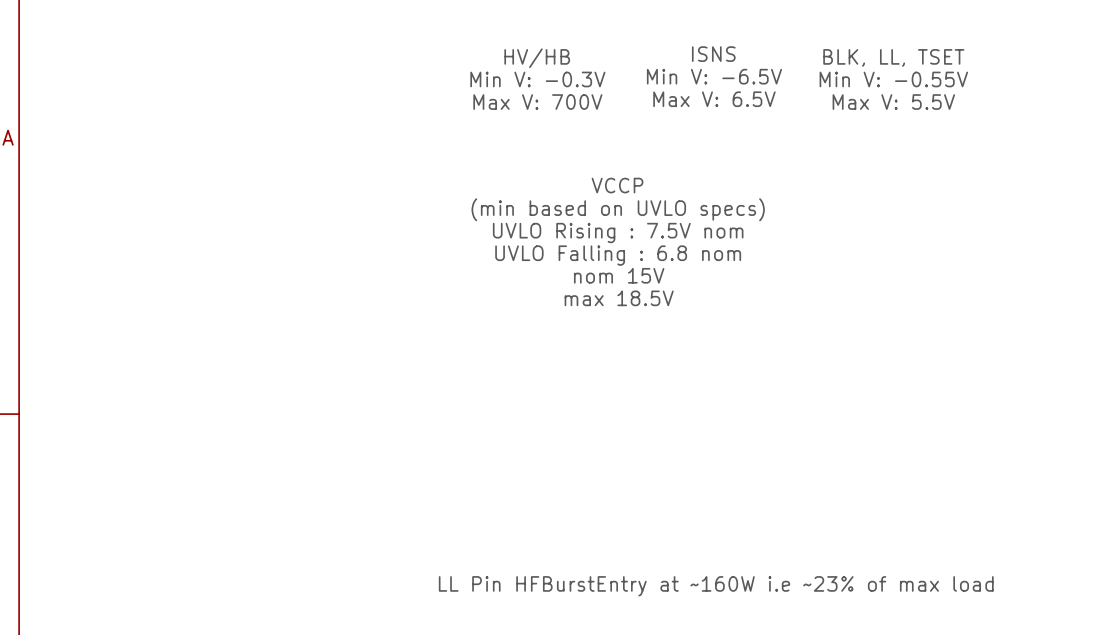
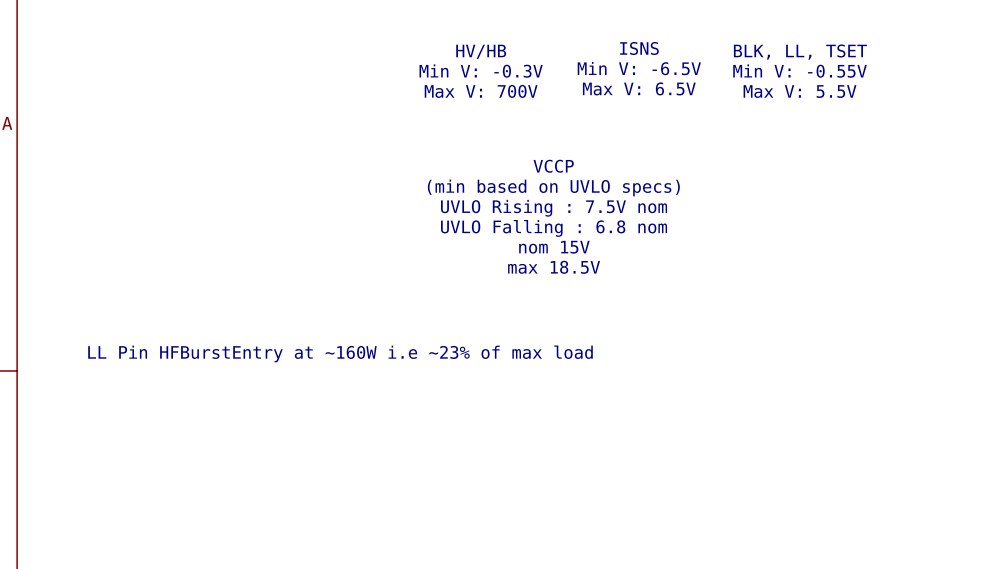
text: none -> LL Pin HFBurstEntry at ~160W i.e ~23% of max load (340, 353)
text: LL Pin HFBurstEntry at ~160W i.e ~23% of max load (716, 586) -> none

